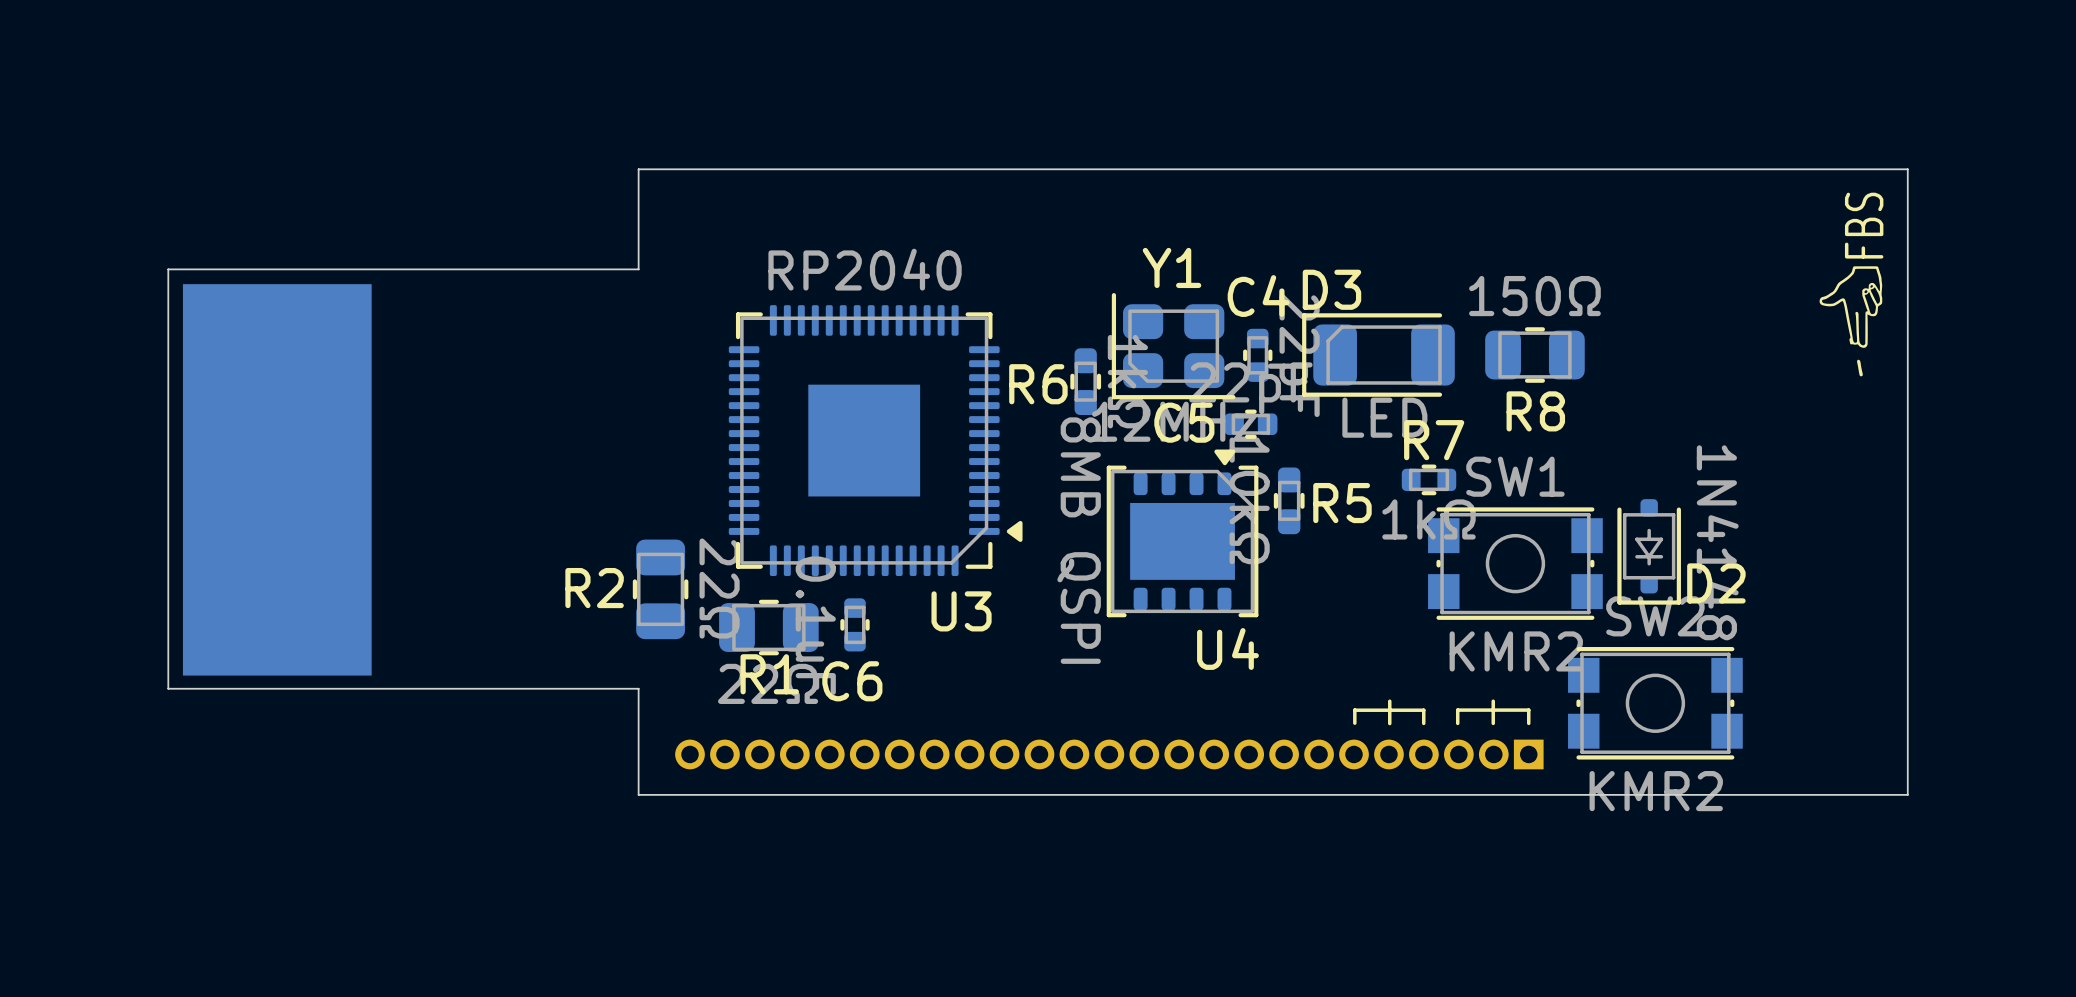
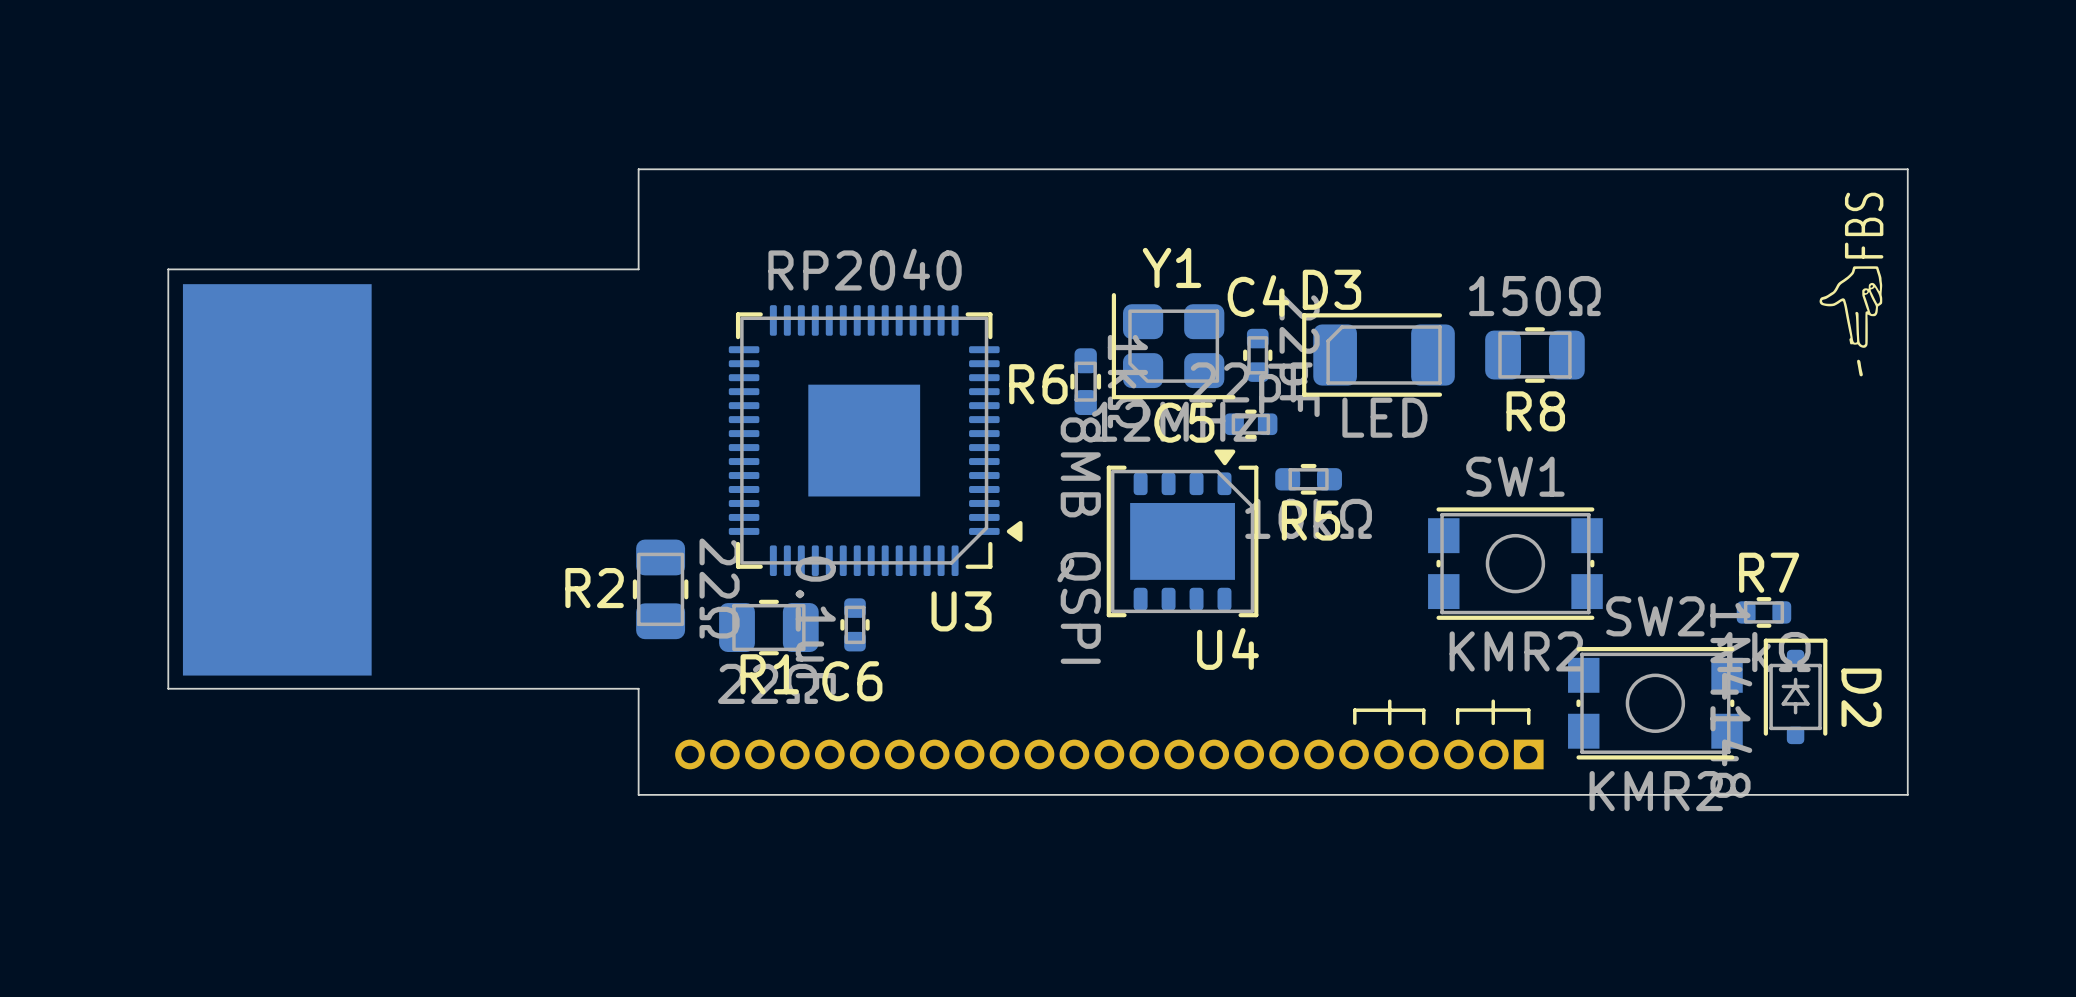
R7 position: (1429, 479) -> (1763, 612)
R5 rotation: 0° (1289, 500) -> 90° clockwise (1308, 479)
D2 rotation: 0° (1649, 551) -> 180° (1795, 691)
D2 position: (1649, 551) -> (1795, 691)

